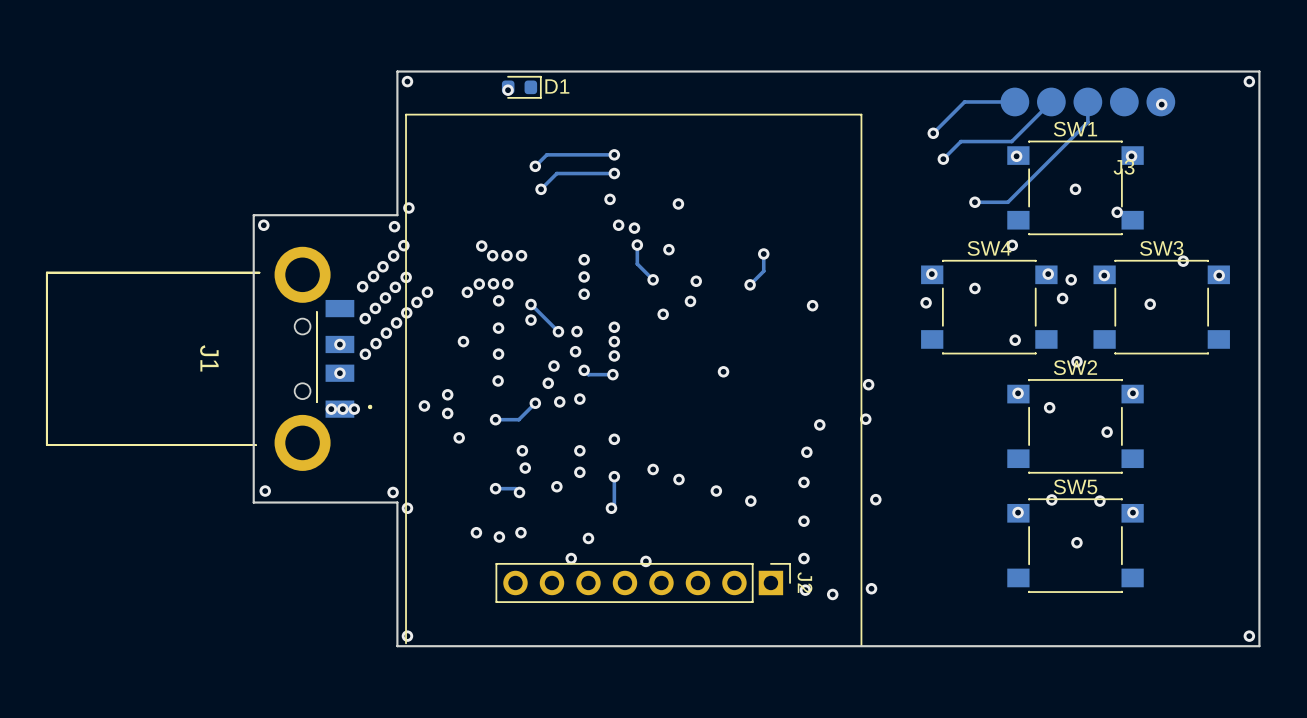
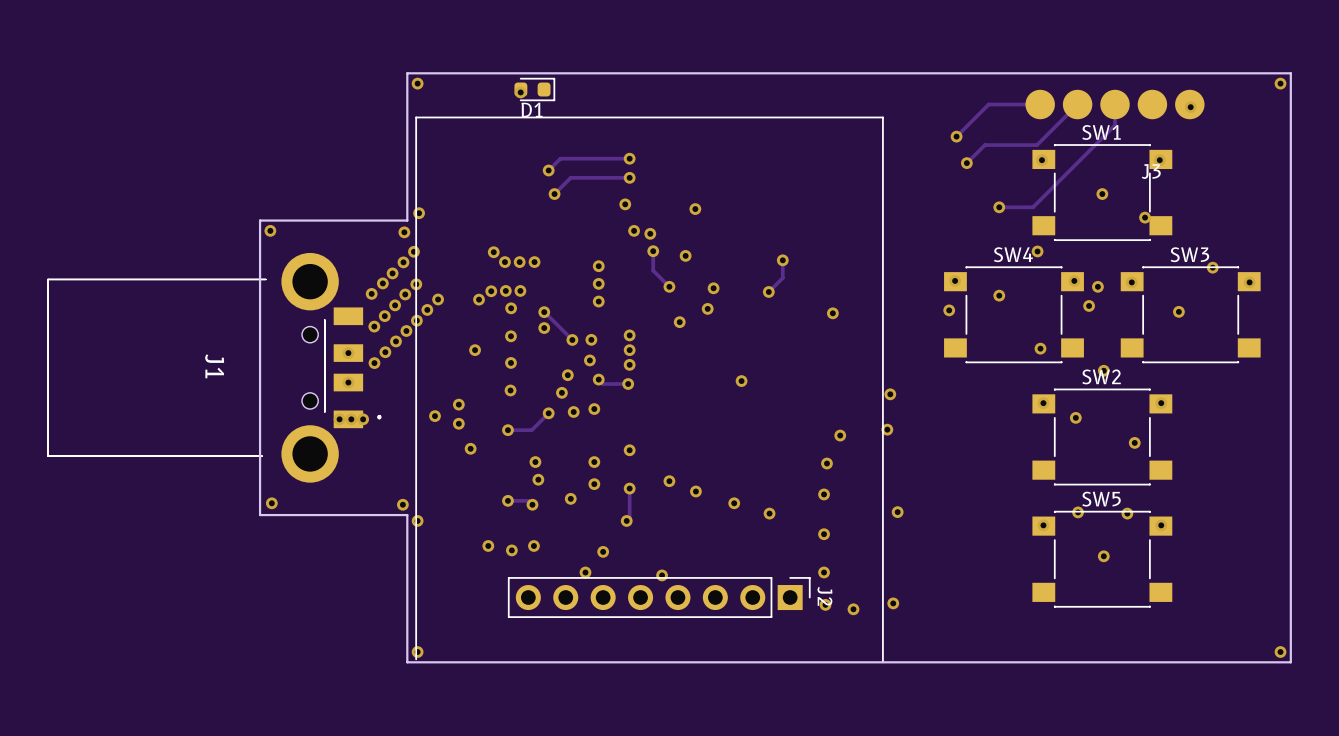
D1 name position: D1 (557, 86) -> D1 (532, 110)

